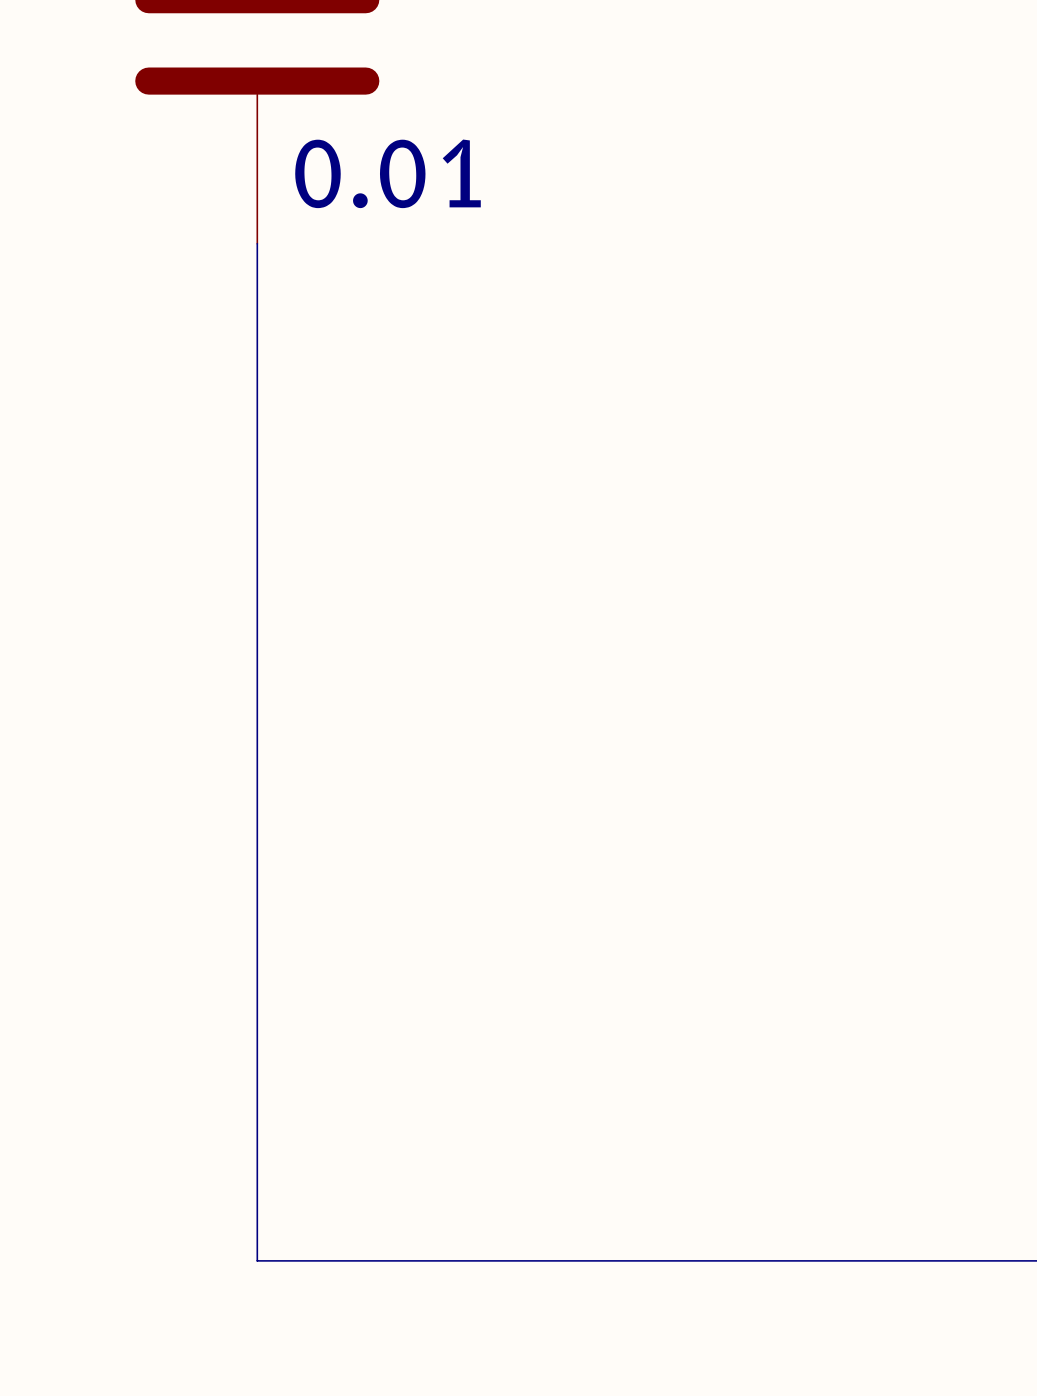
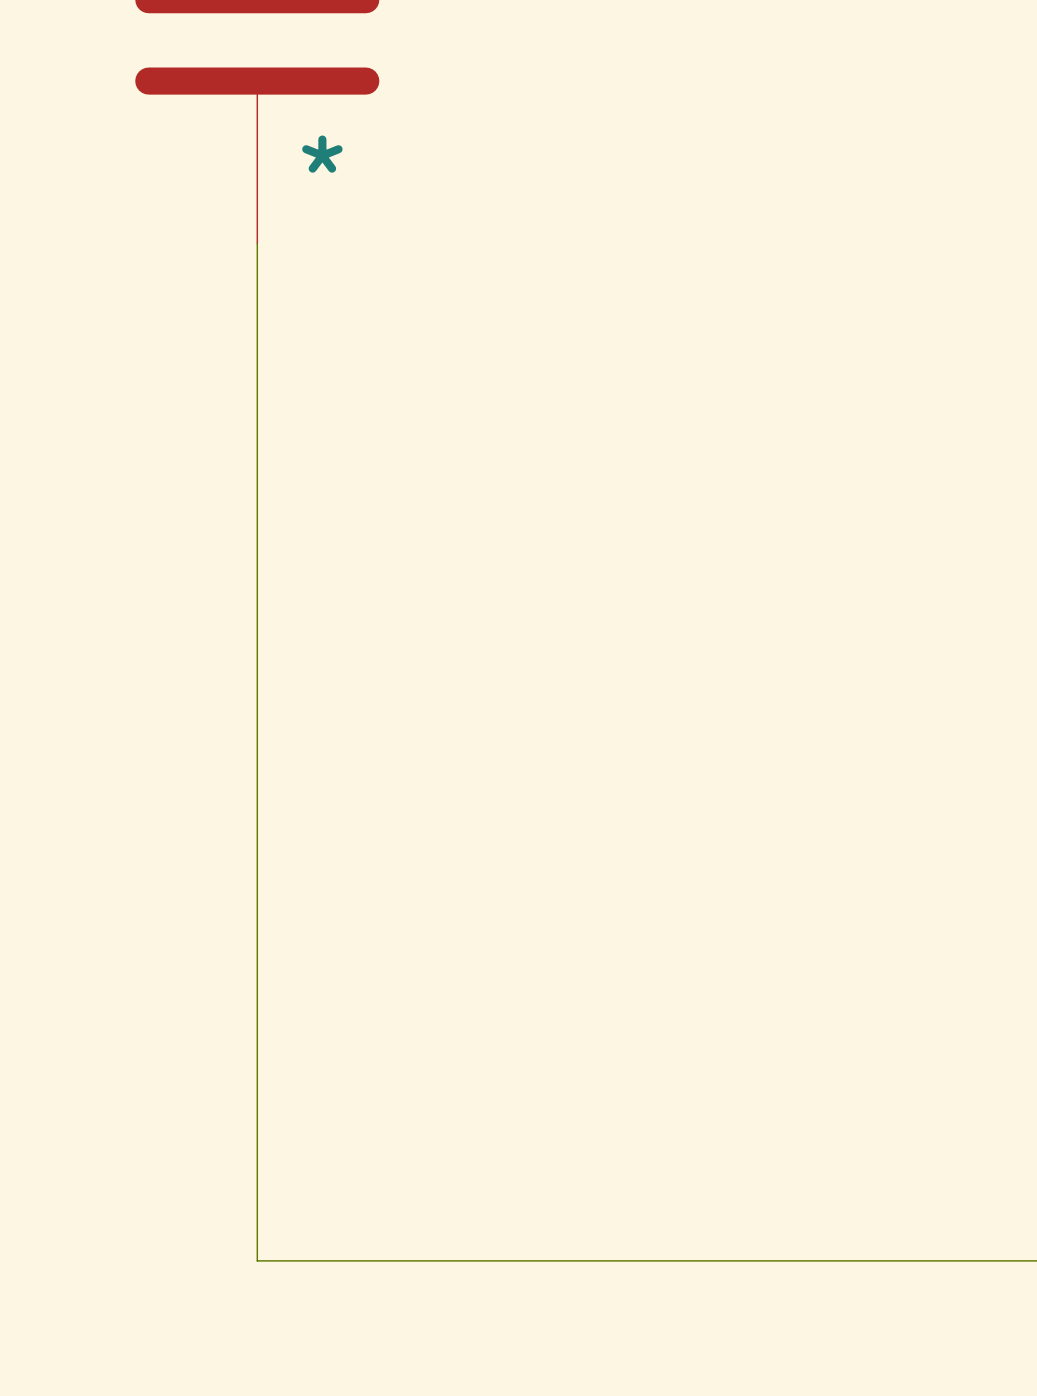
part value: 0.01 (388, 173) -> * (322, 154)

